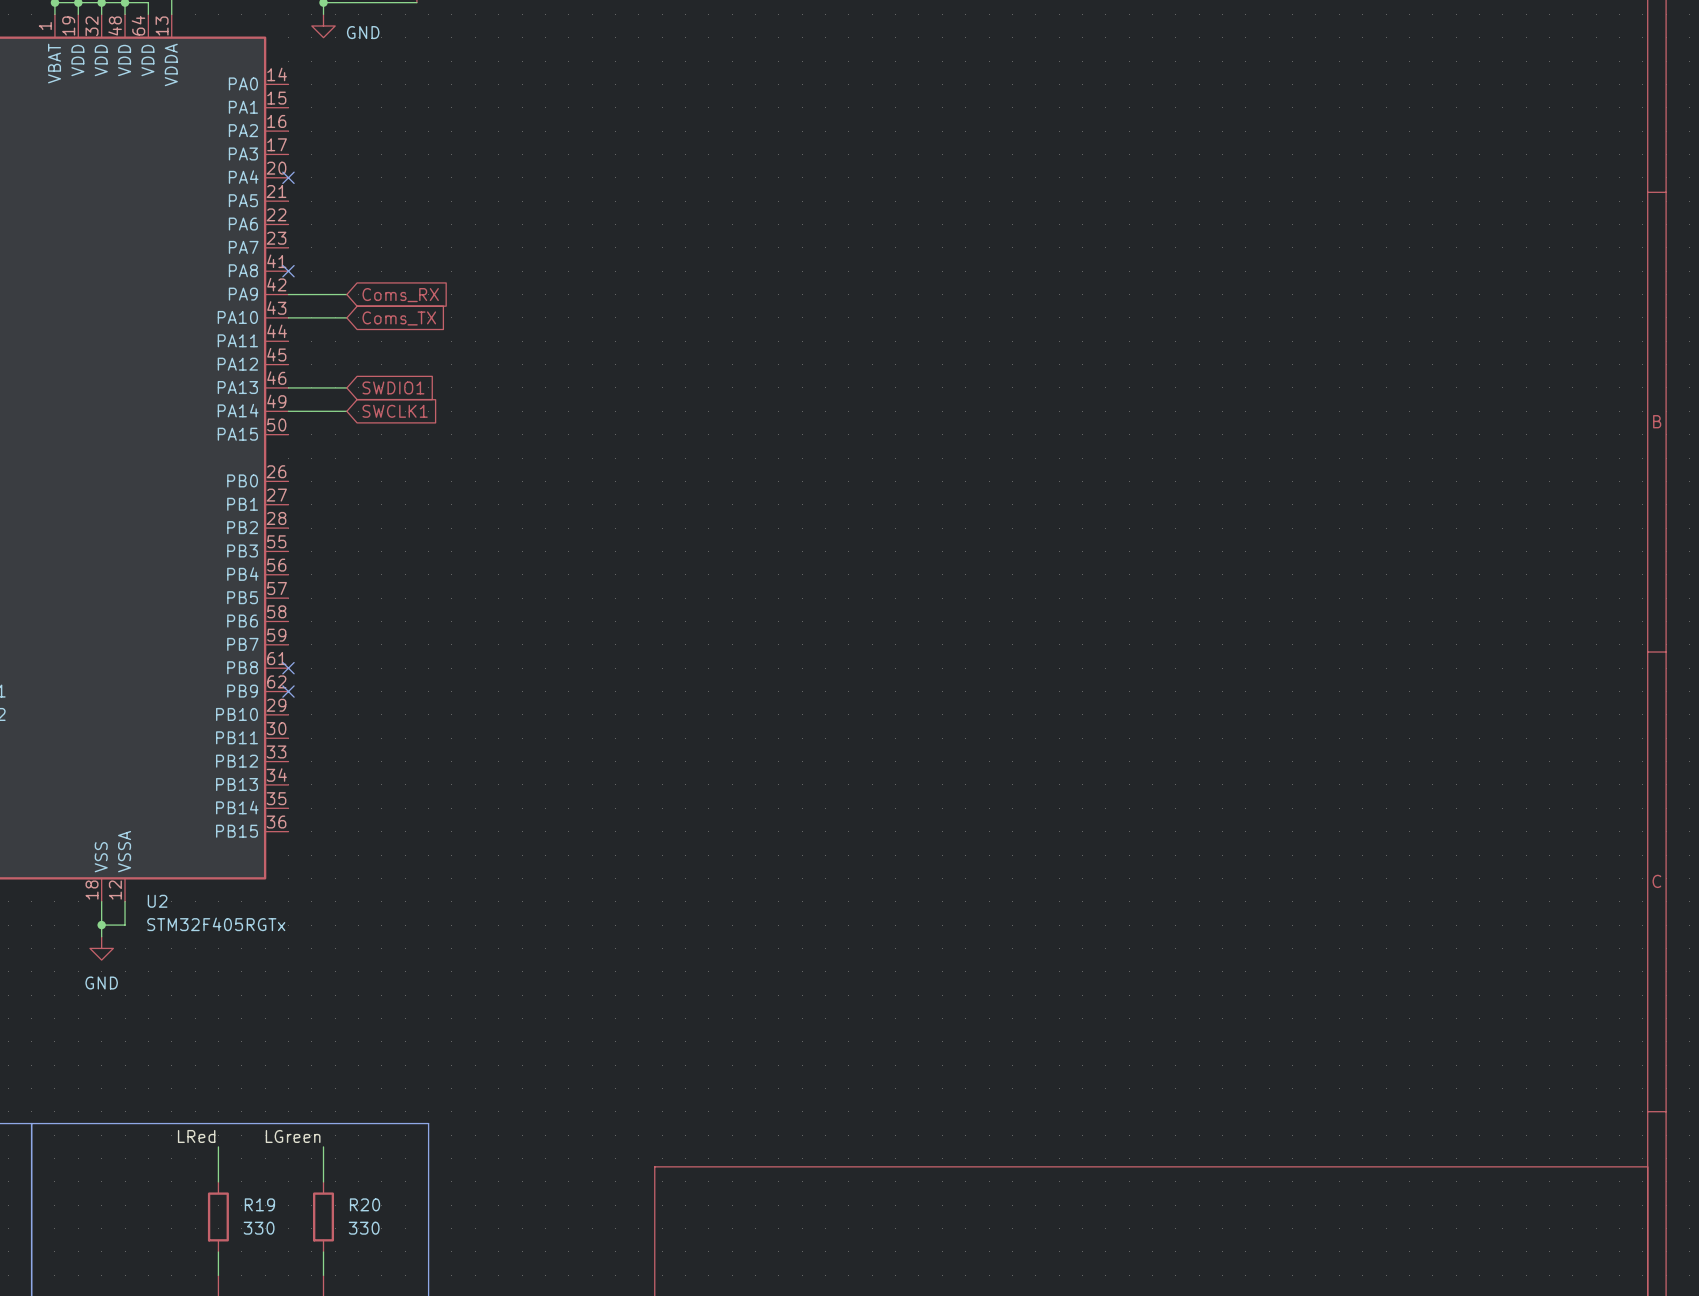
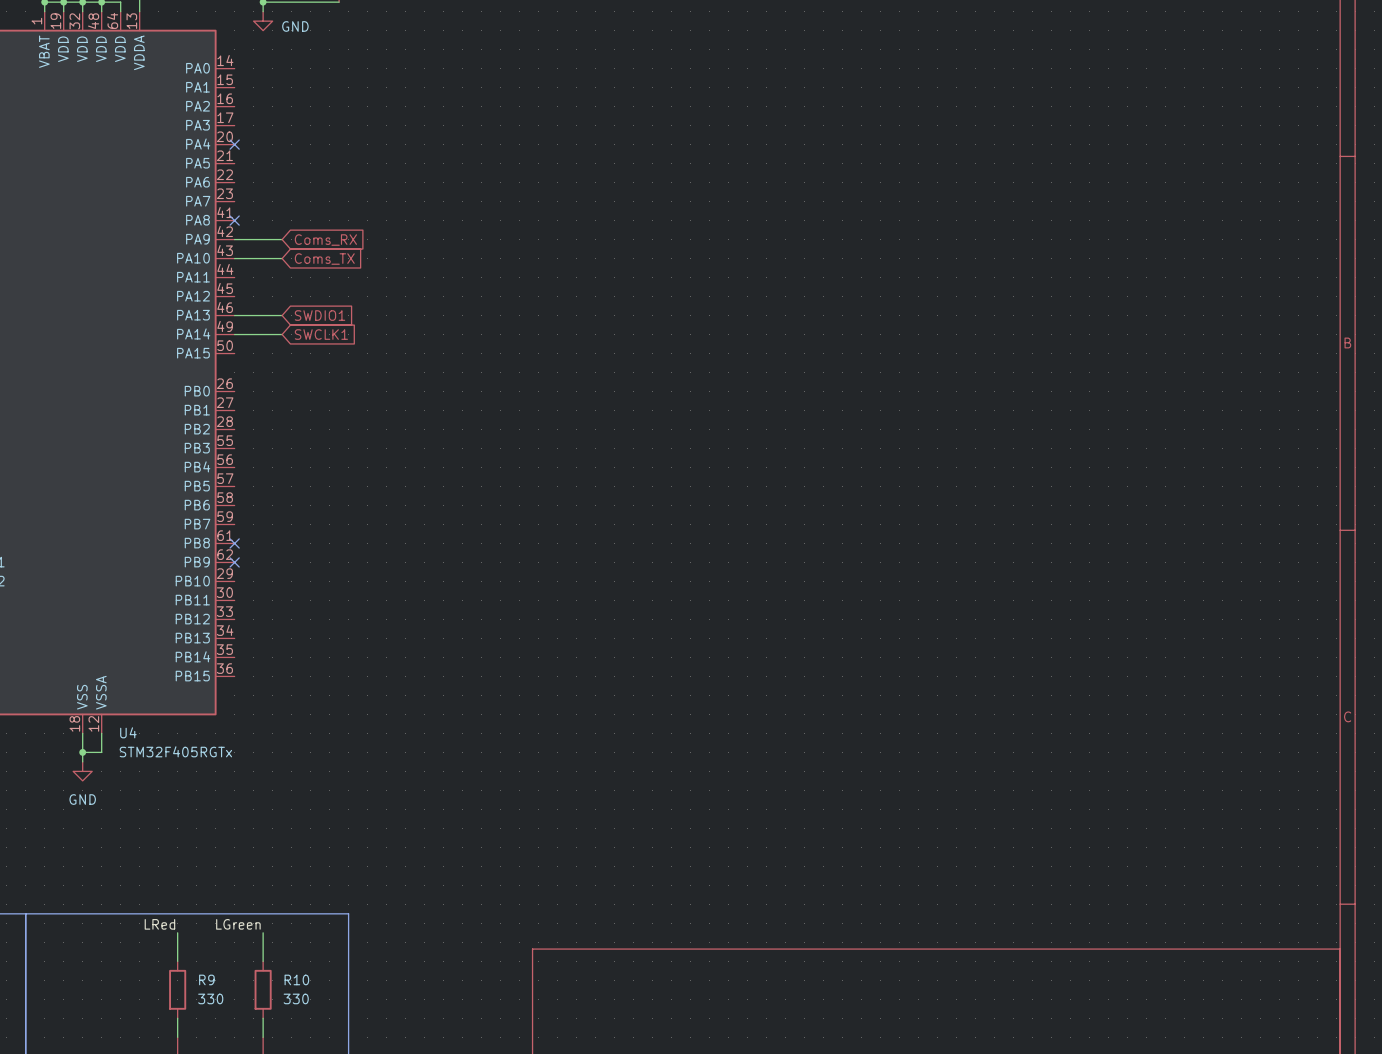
U2 name: U2 (157, 901) -> U4 (128, 732)
R19 name: R19 (259, 1204) -> R9 (206, 979)
R20 name: R20 (365, 1204) -> R10 (296, 979)

